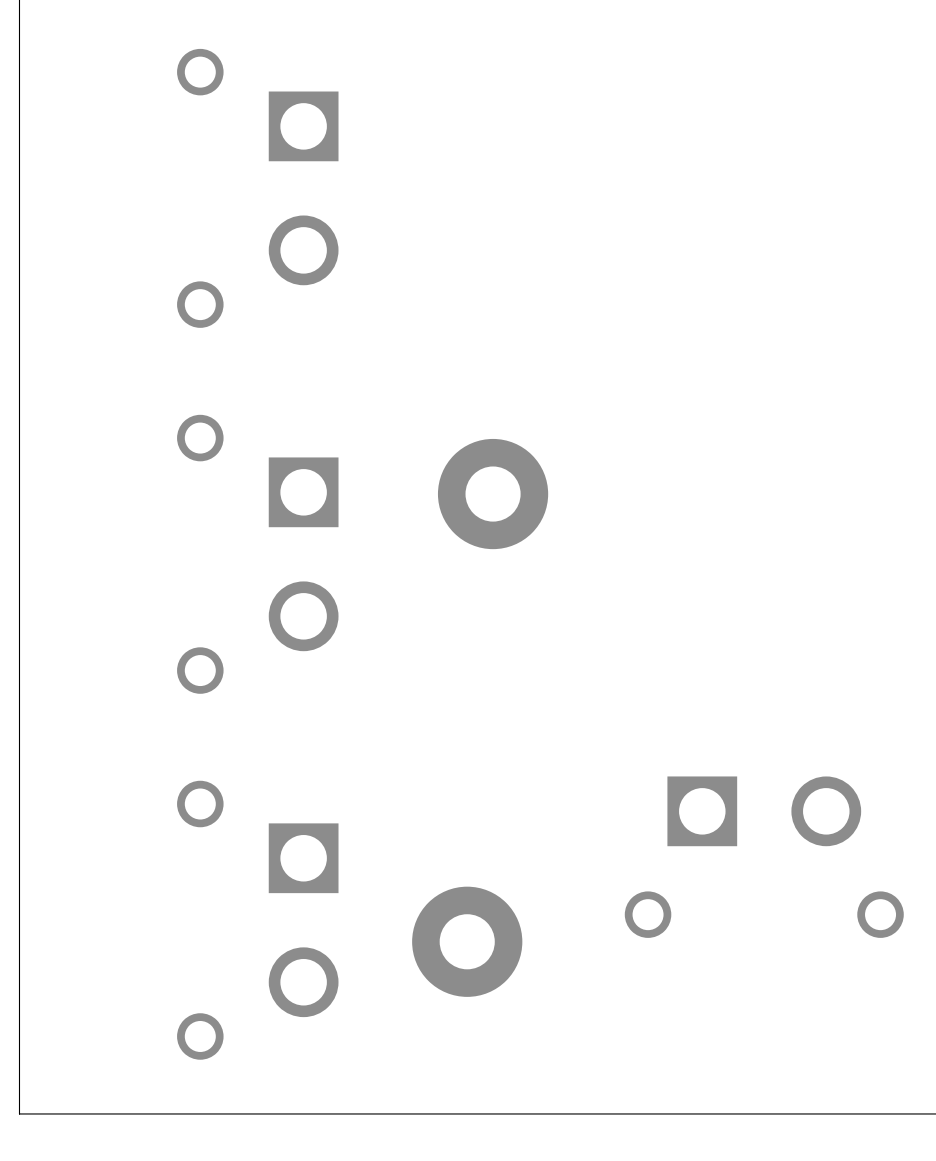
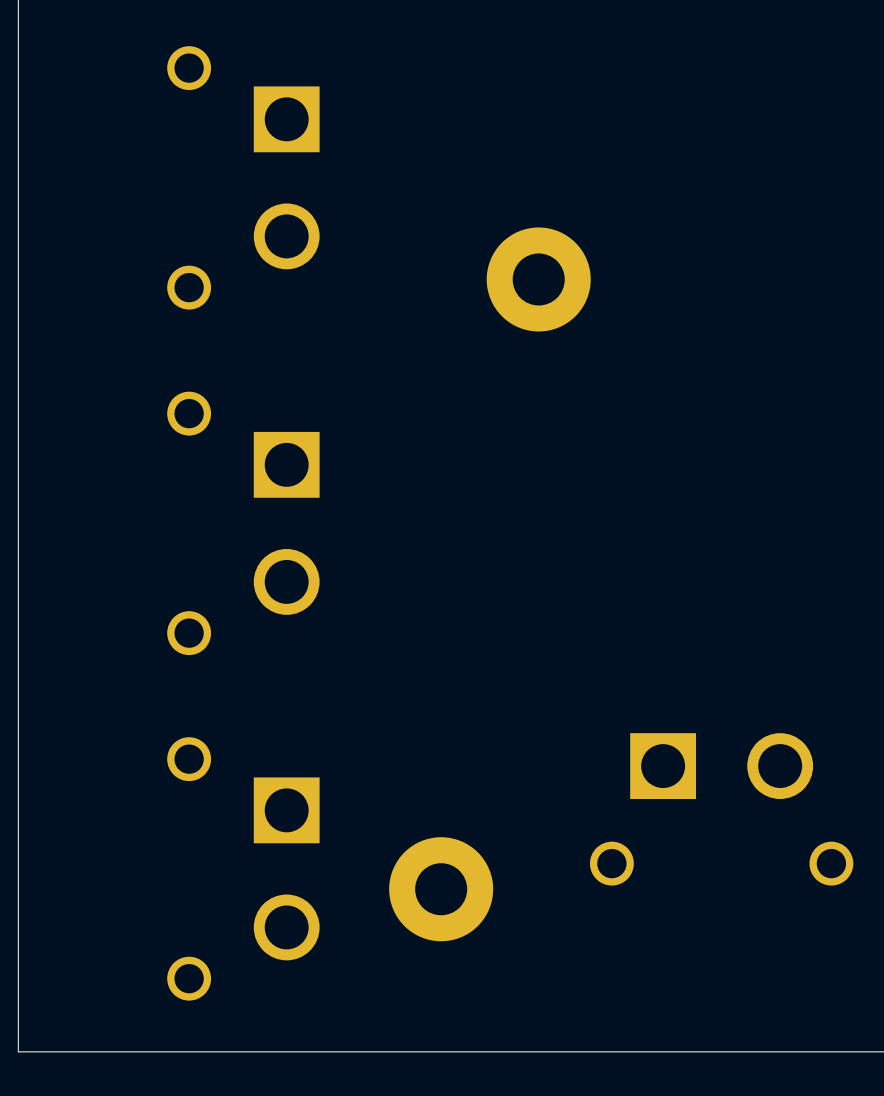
part position: (493, 494) -> (538, 279)

